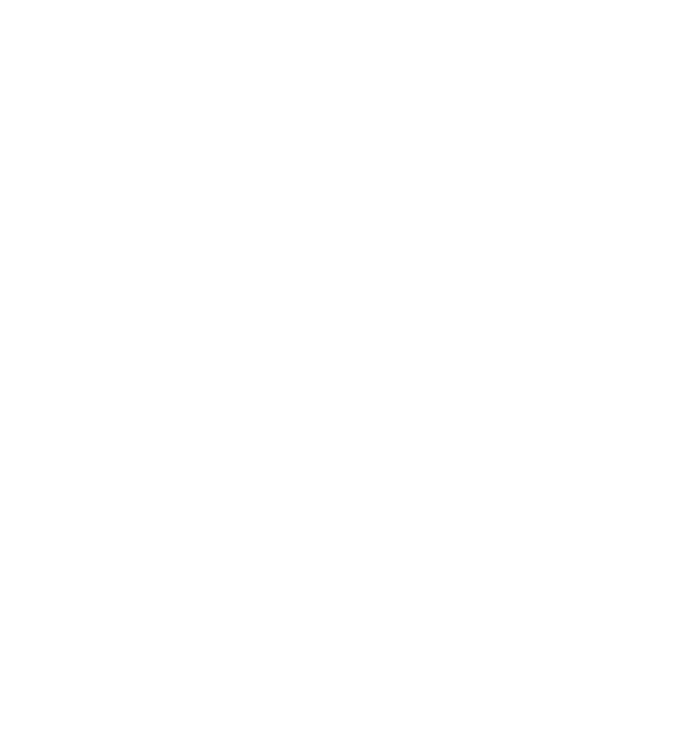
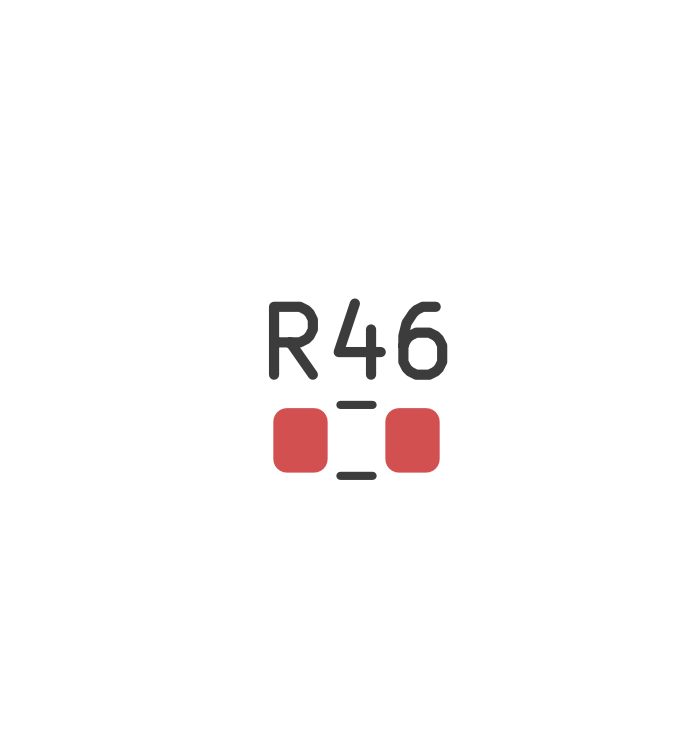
R46: none -> (356, 440)

